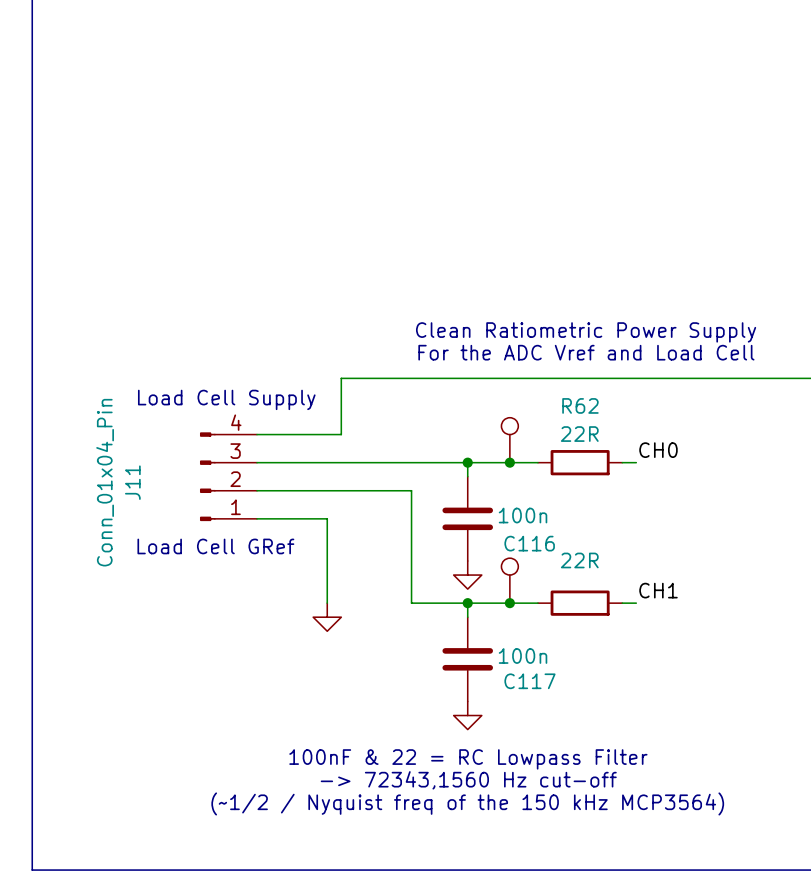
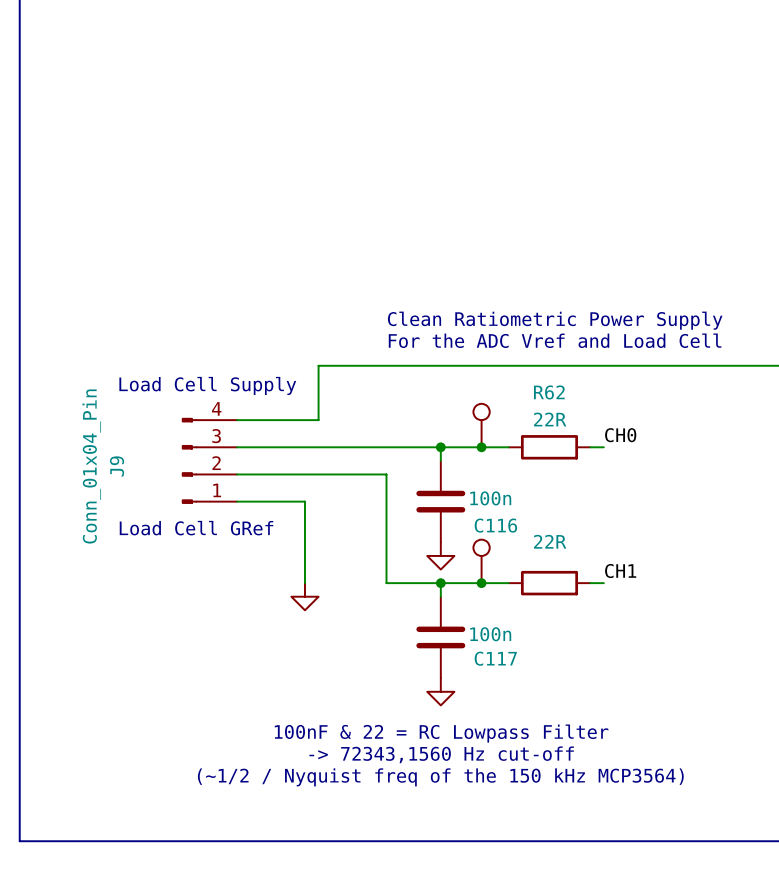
J11 name: J11 (132, 482) -> J9 (117, 466)

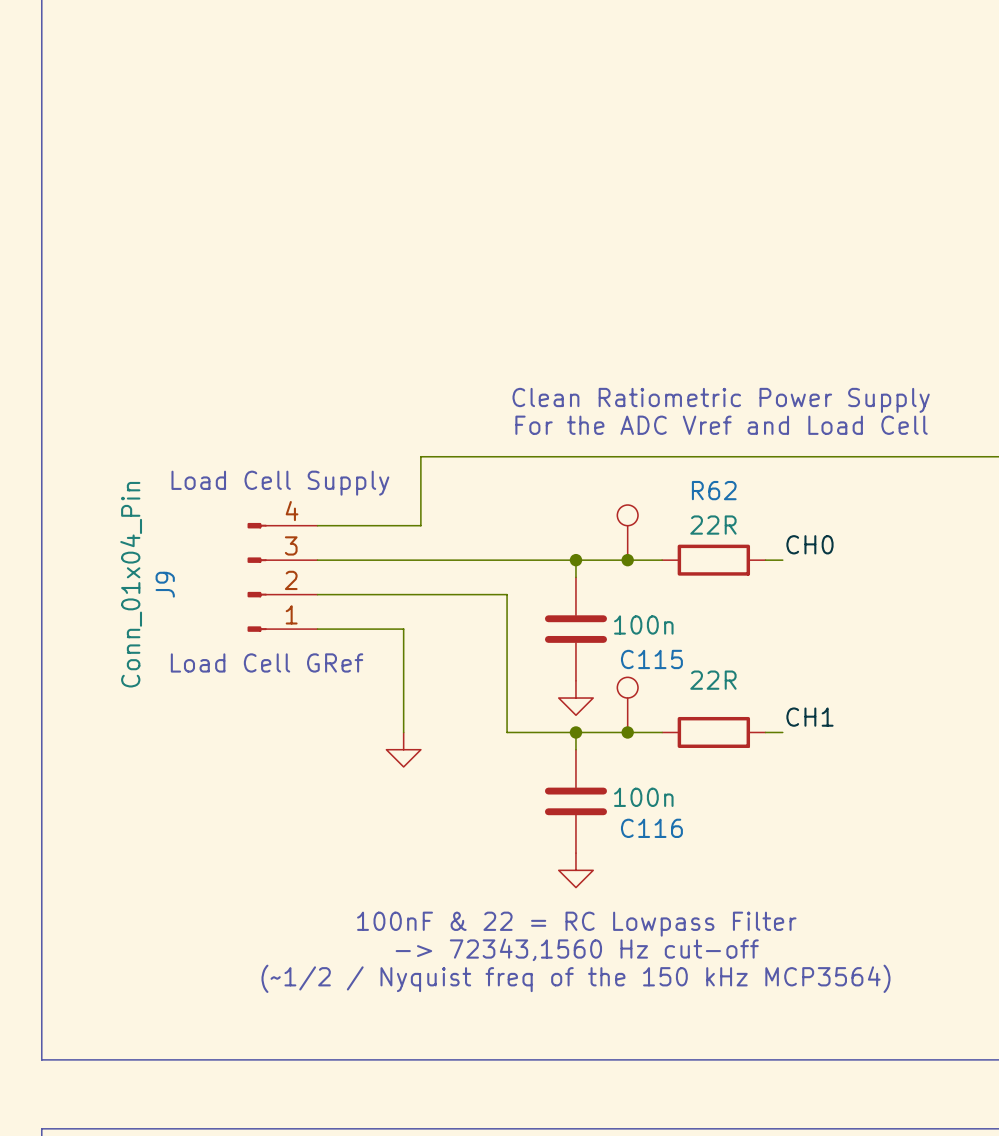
C116 name: C116 (495, 525) -> C115 (651, 659)
C117 name: C117 (495, 658) -> C116 (651, 828)

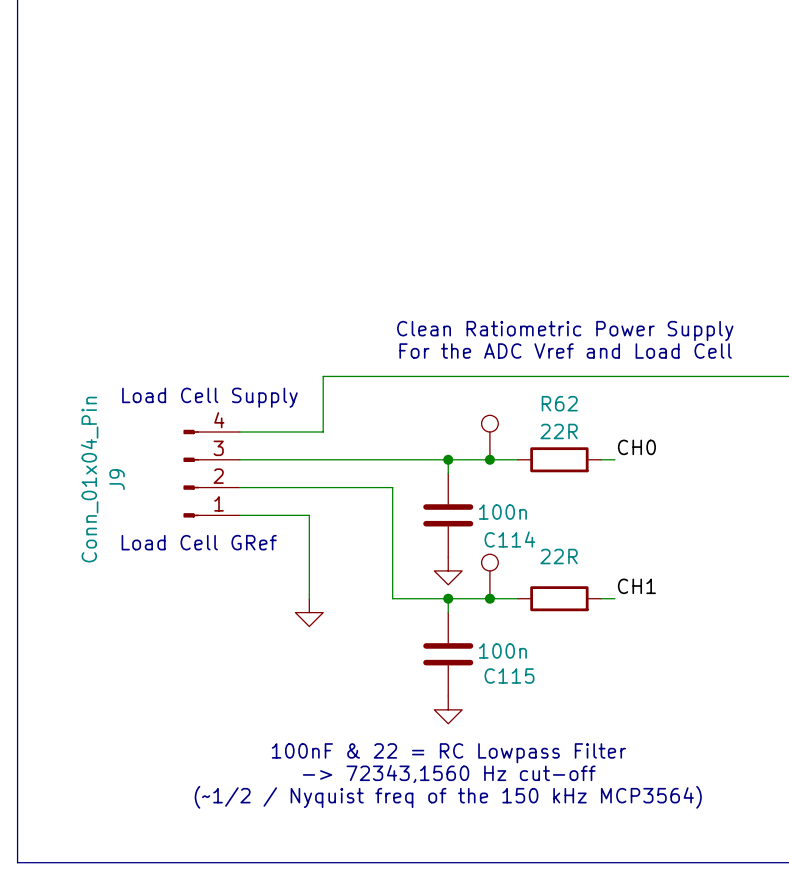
C115 name: C115 (651, 659) -> C114 (509, 539)
C116 name: C116 (651, 828) -> C115 (509, 676)

